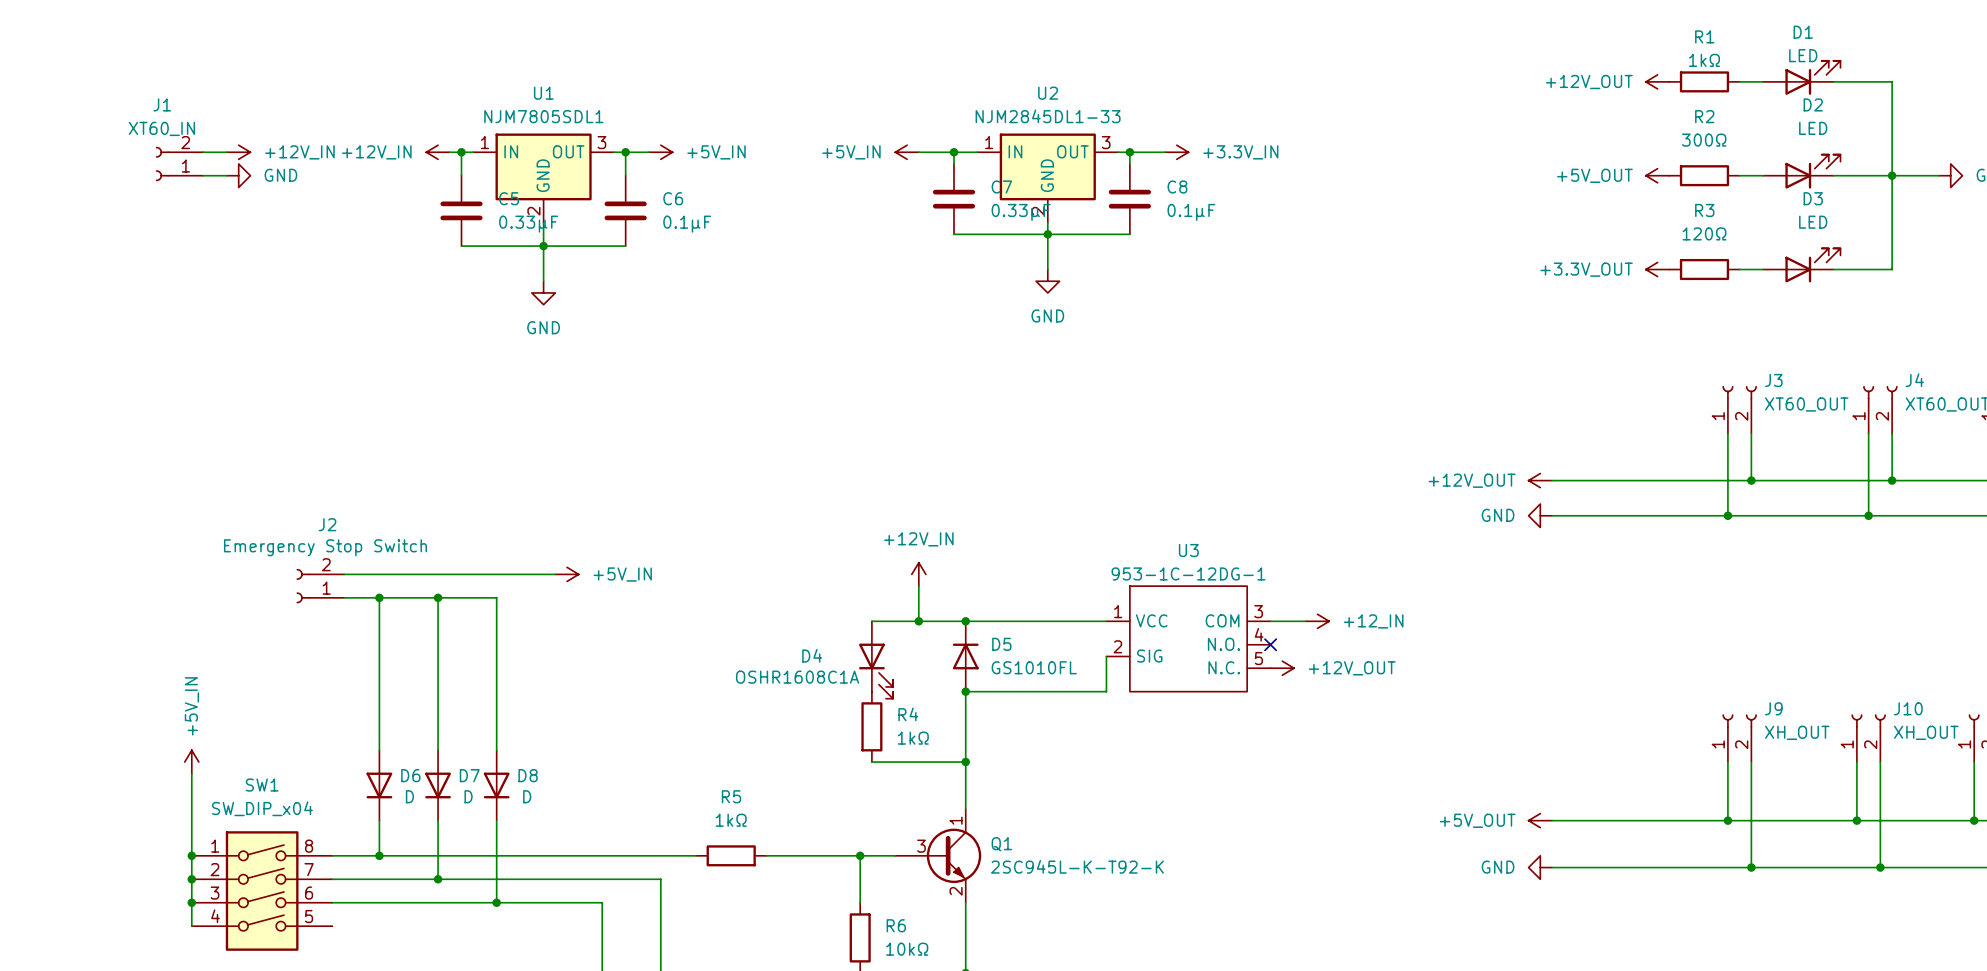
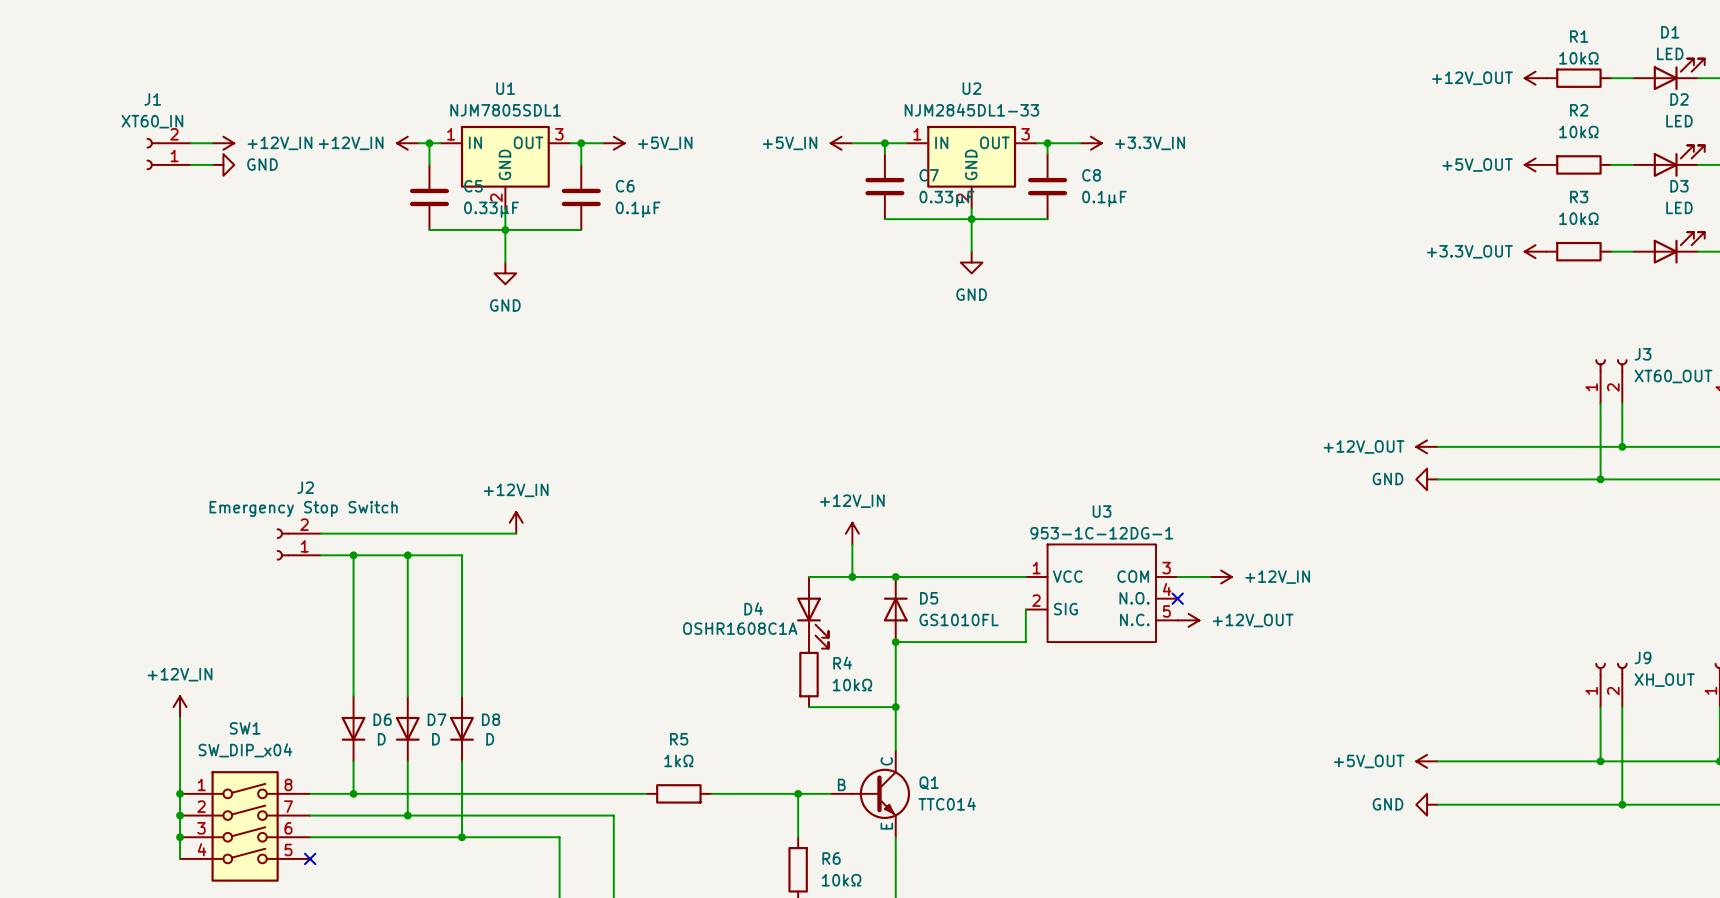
R1 value: 1kΩ (1704, 60) -> 10kΩ (1578, 58)
R2 value: 300Ω (1704, 140) -> 10kΩ (1578, 131)
R3 value: 120Ω (1704, 233) -> 10kΩ (1578, 218)
power symbol: none -> +12V_IN (516, 522)
power symbol: +5V_IN (567, 574) -> none
power symbol: +12_IN (1317, 621) -> +12V_IN (1221, 577)
R4 value: 1kΩ (913, 738) -> 10kΩ (852, 685)
power symbol: +5V_IN (191, 762) -> +12V_IN (180, 707)
Q1 symbol: [895, 808, 982, 903] -> [830, 750, 911, 838]
Q1 value: 2SC945L-K-T92-K (1077, 866) -> TTC014 (947, 804)
no-connect mark: none -> (310, 858)

